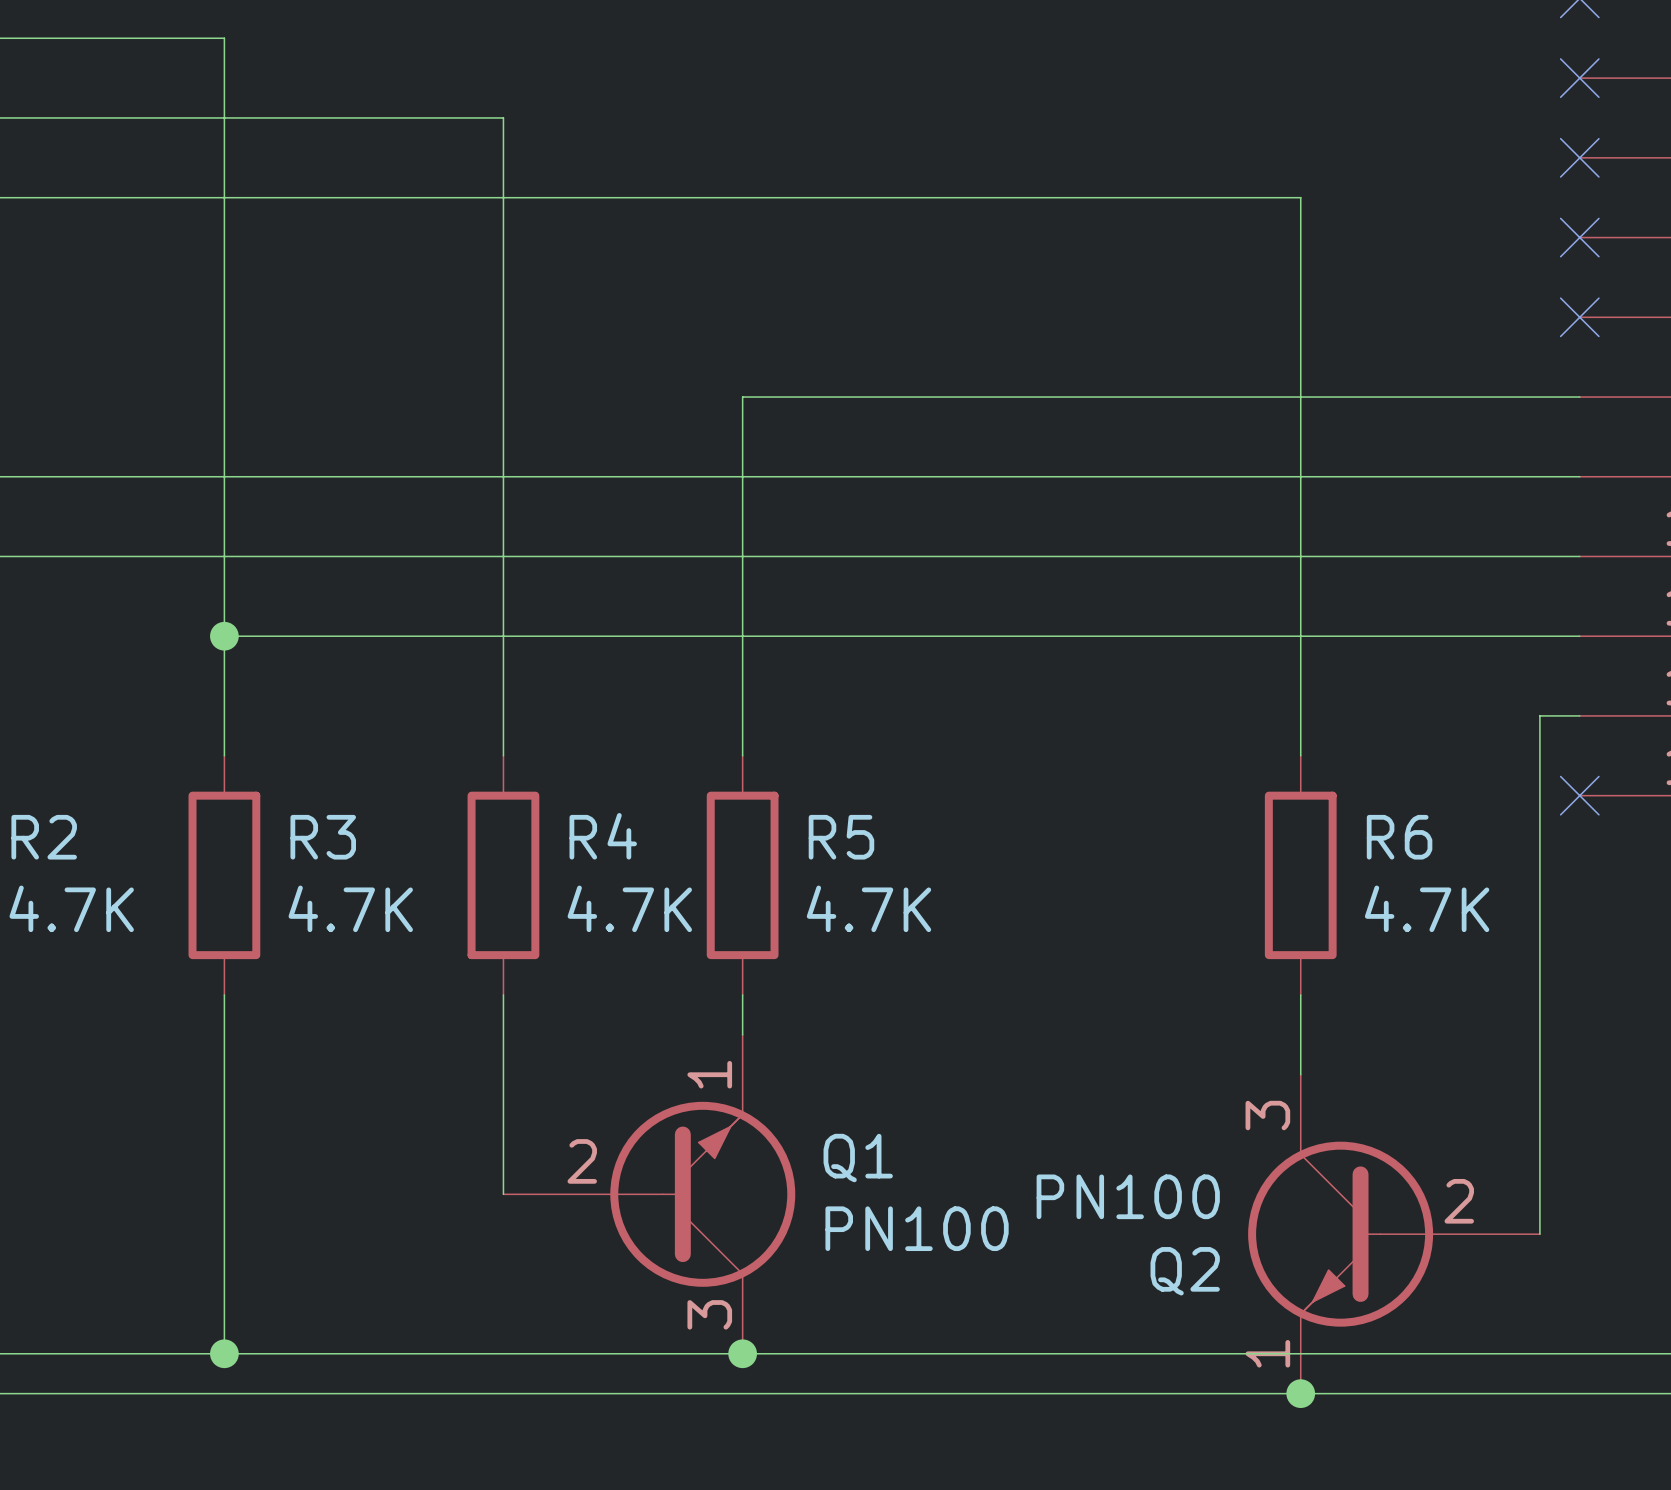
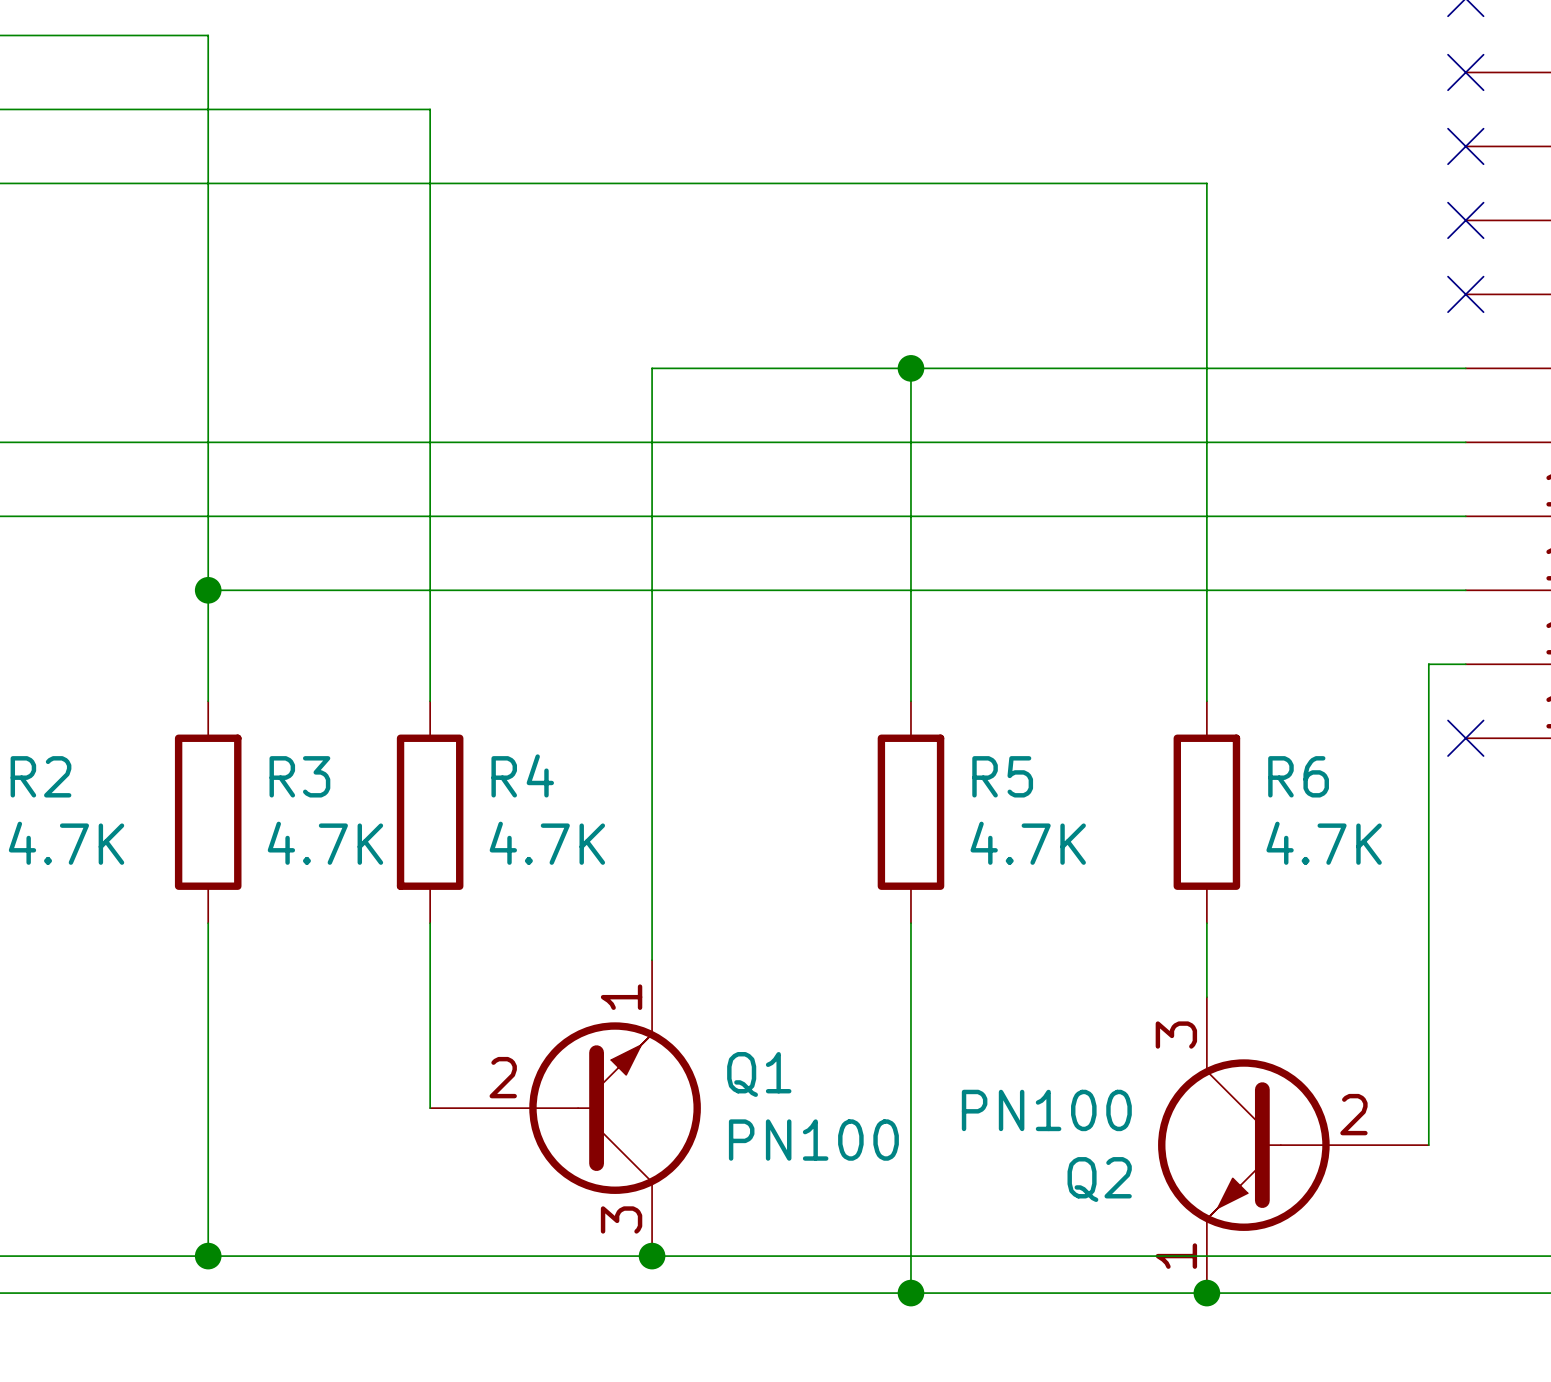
wire: (463, 117) (503, 117) (503, 755) -> (430, 109) (430, 701)
wire: (742, 397) (742, 755) -> (689, 368) (652, 368) (652, 960)
wire: none -> (910, 368) (910, 701)
junction: none -> (910, 368)
R4 position: (503, 875) -> (430, 812)
R5 position: (742, 875) -> (910, 812)
wire: (503, 994) (503, 1194) -> (430, 923) (430, 1108)
wire: (742, 994) (742, 1034) -> none
wire: none -> (910, 923) (910, 1293)
Q1 position: (649, 1194) -> (565, 1108)
junction position: (742, 1353) -> (652, 1256)
junction: none -> (910, 1293)

